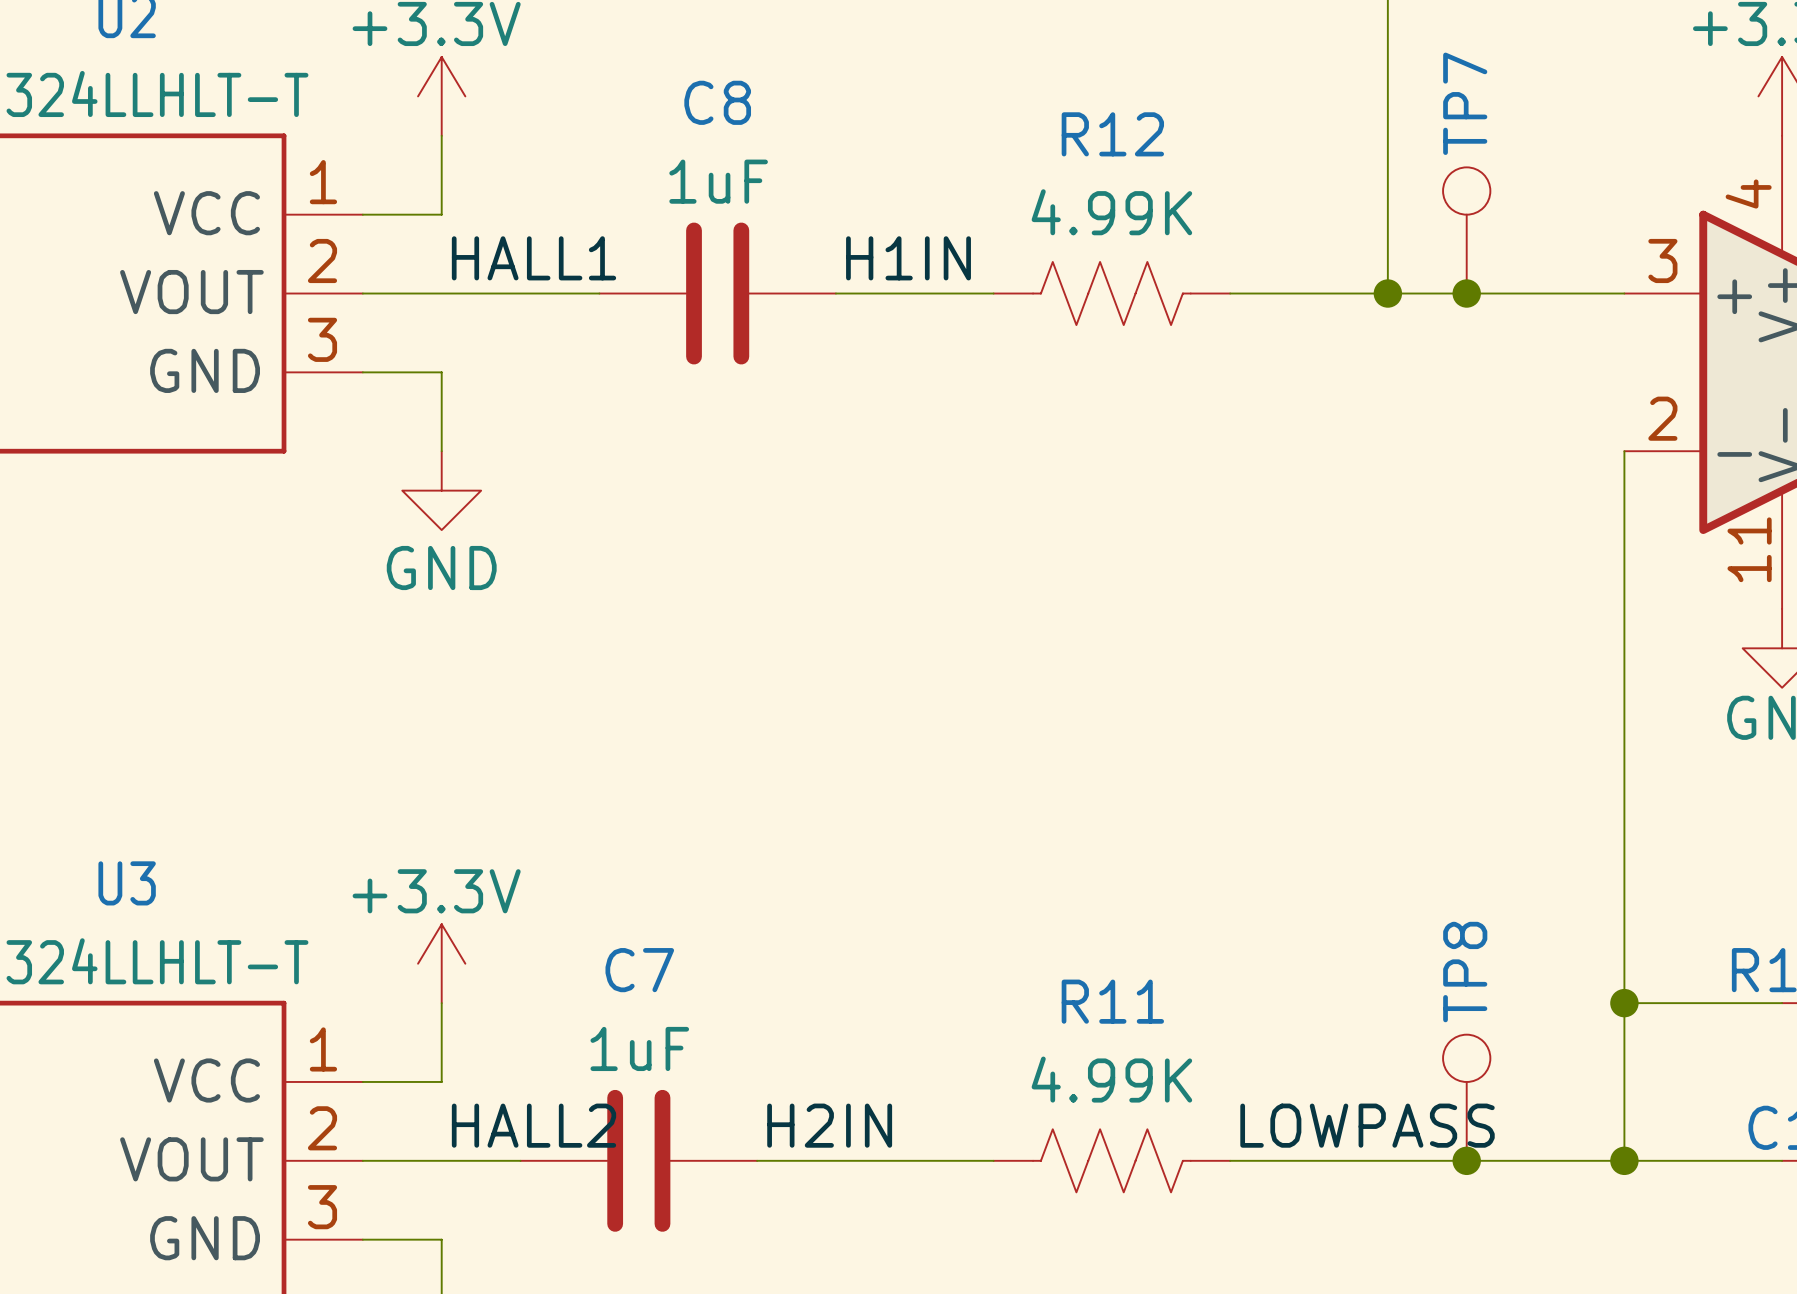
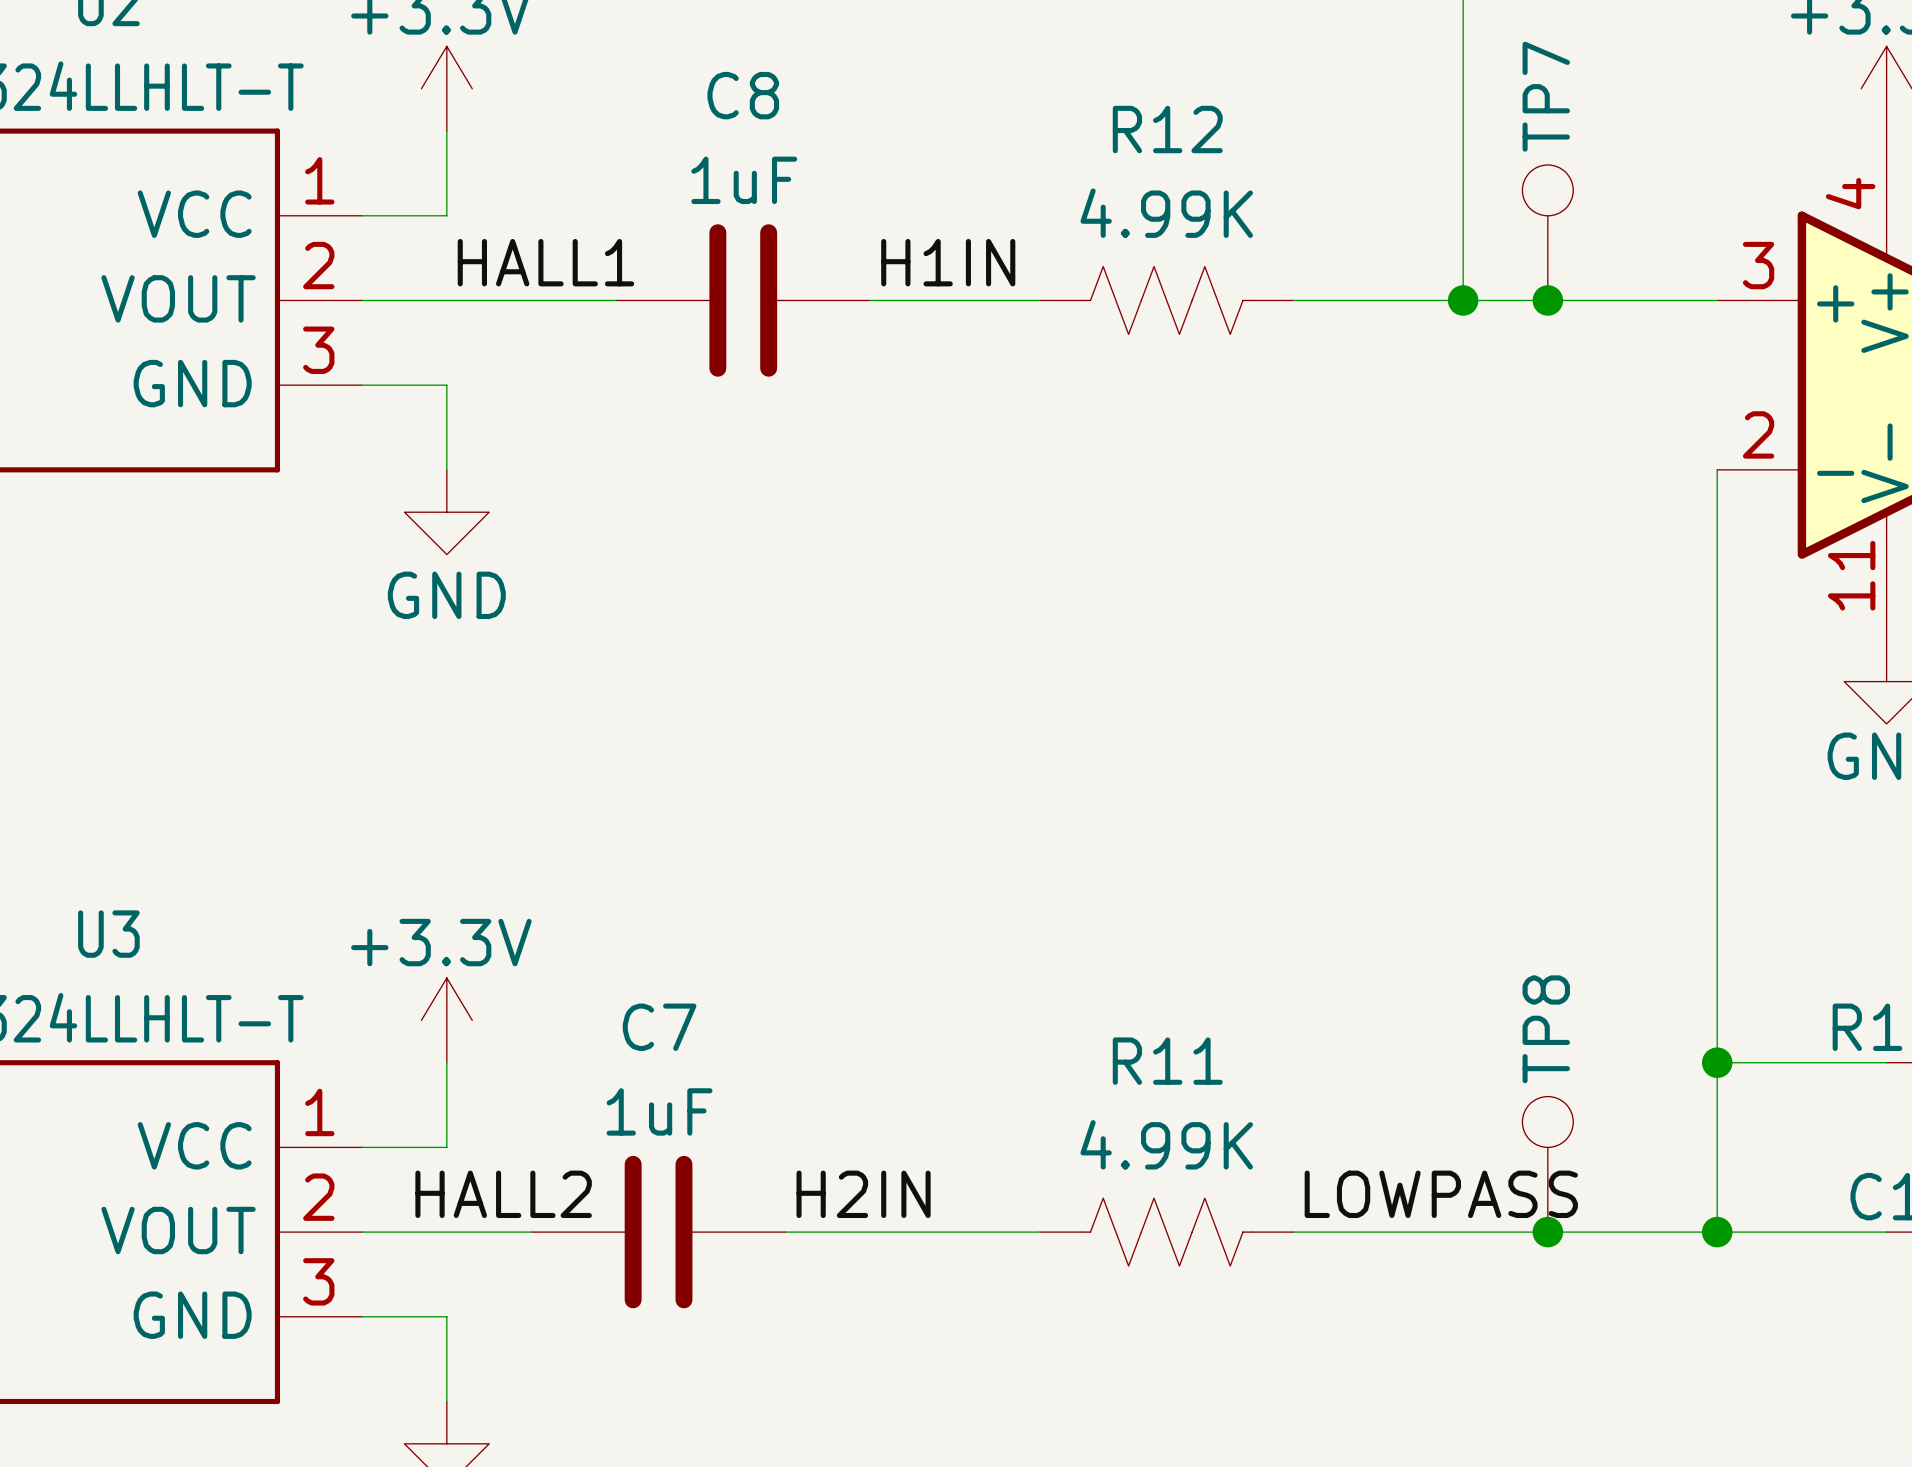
label position: HALL2 (533, 1125) -> HALL2 (503, 1194)

